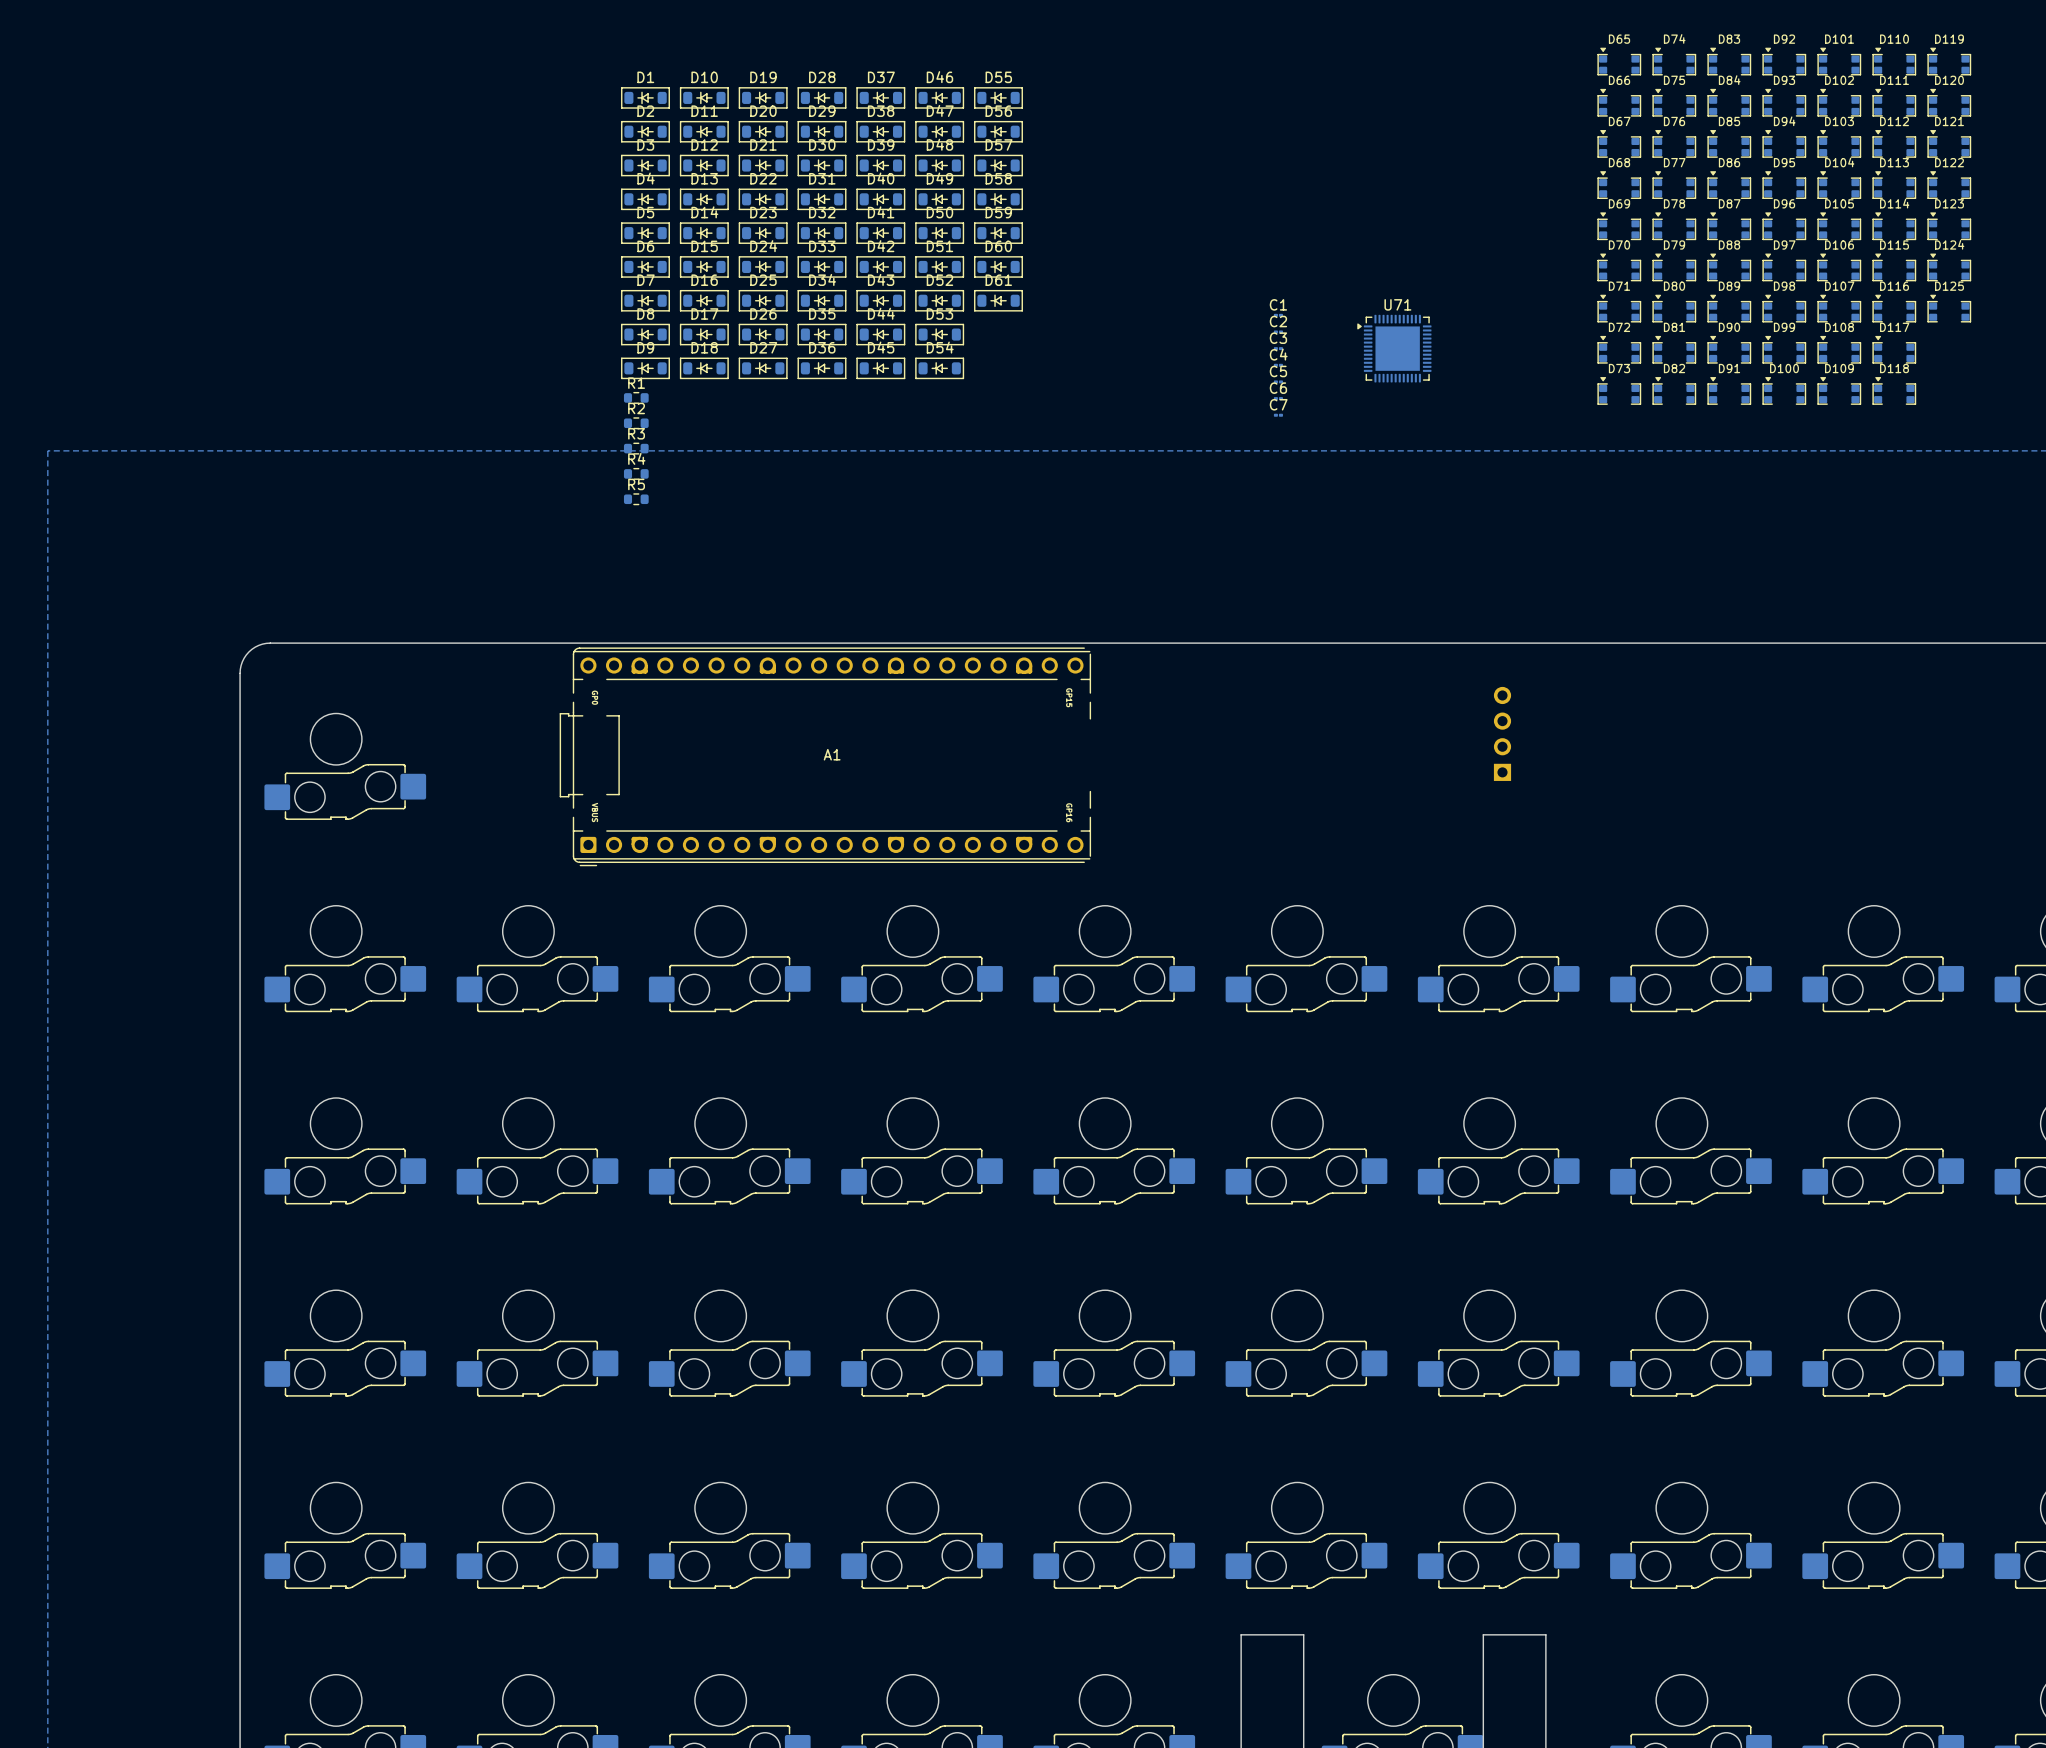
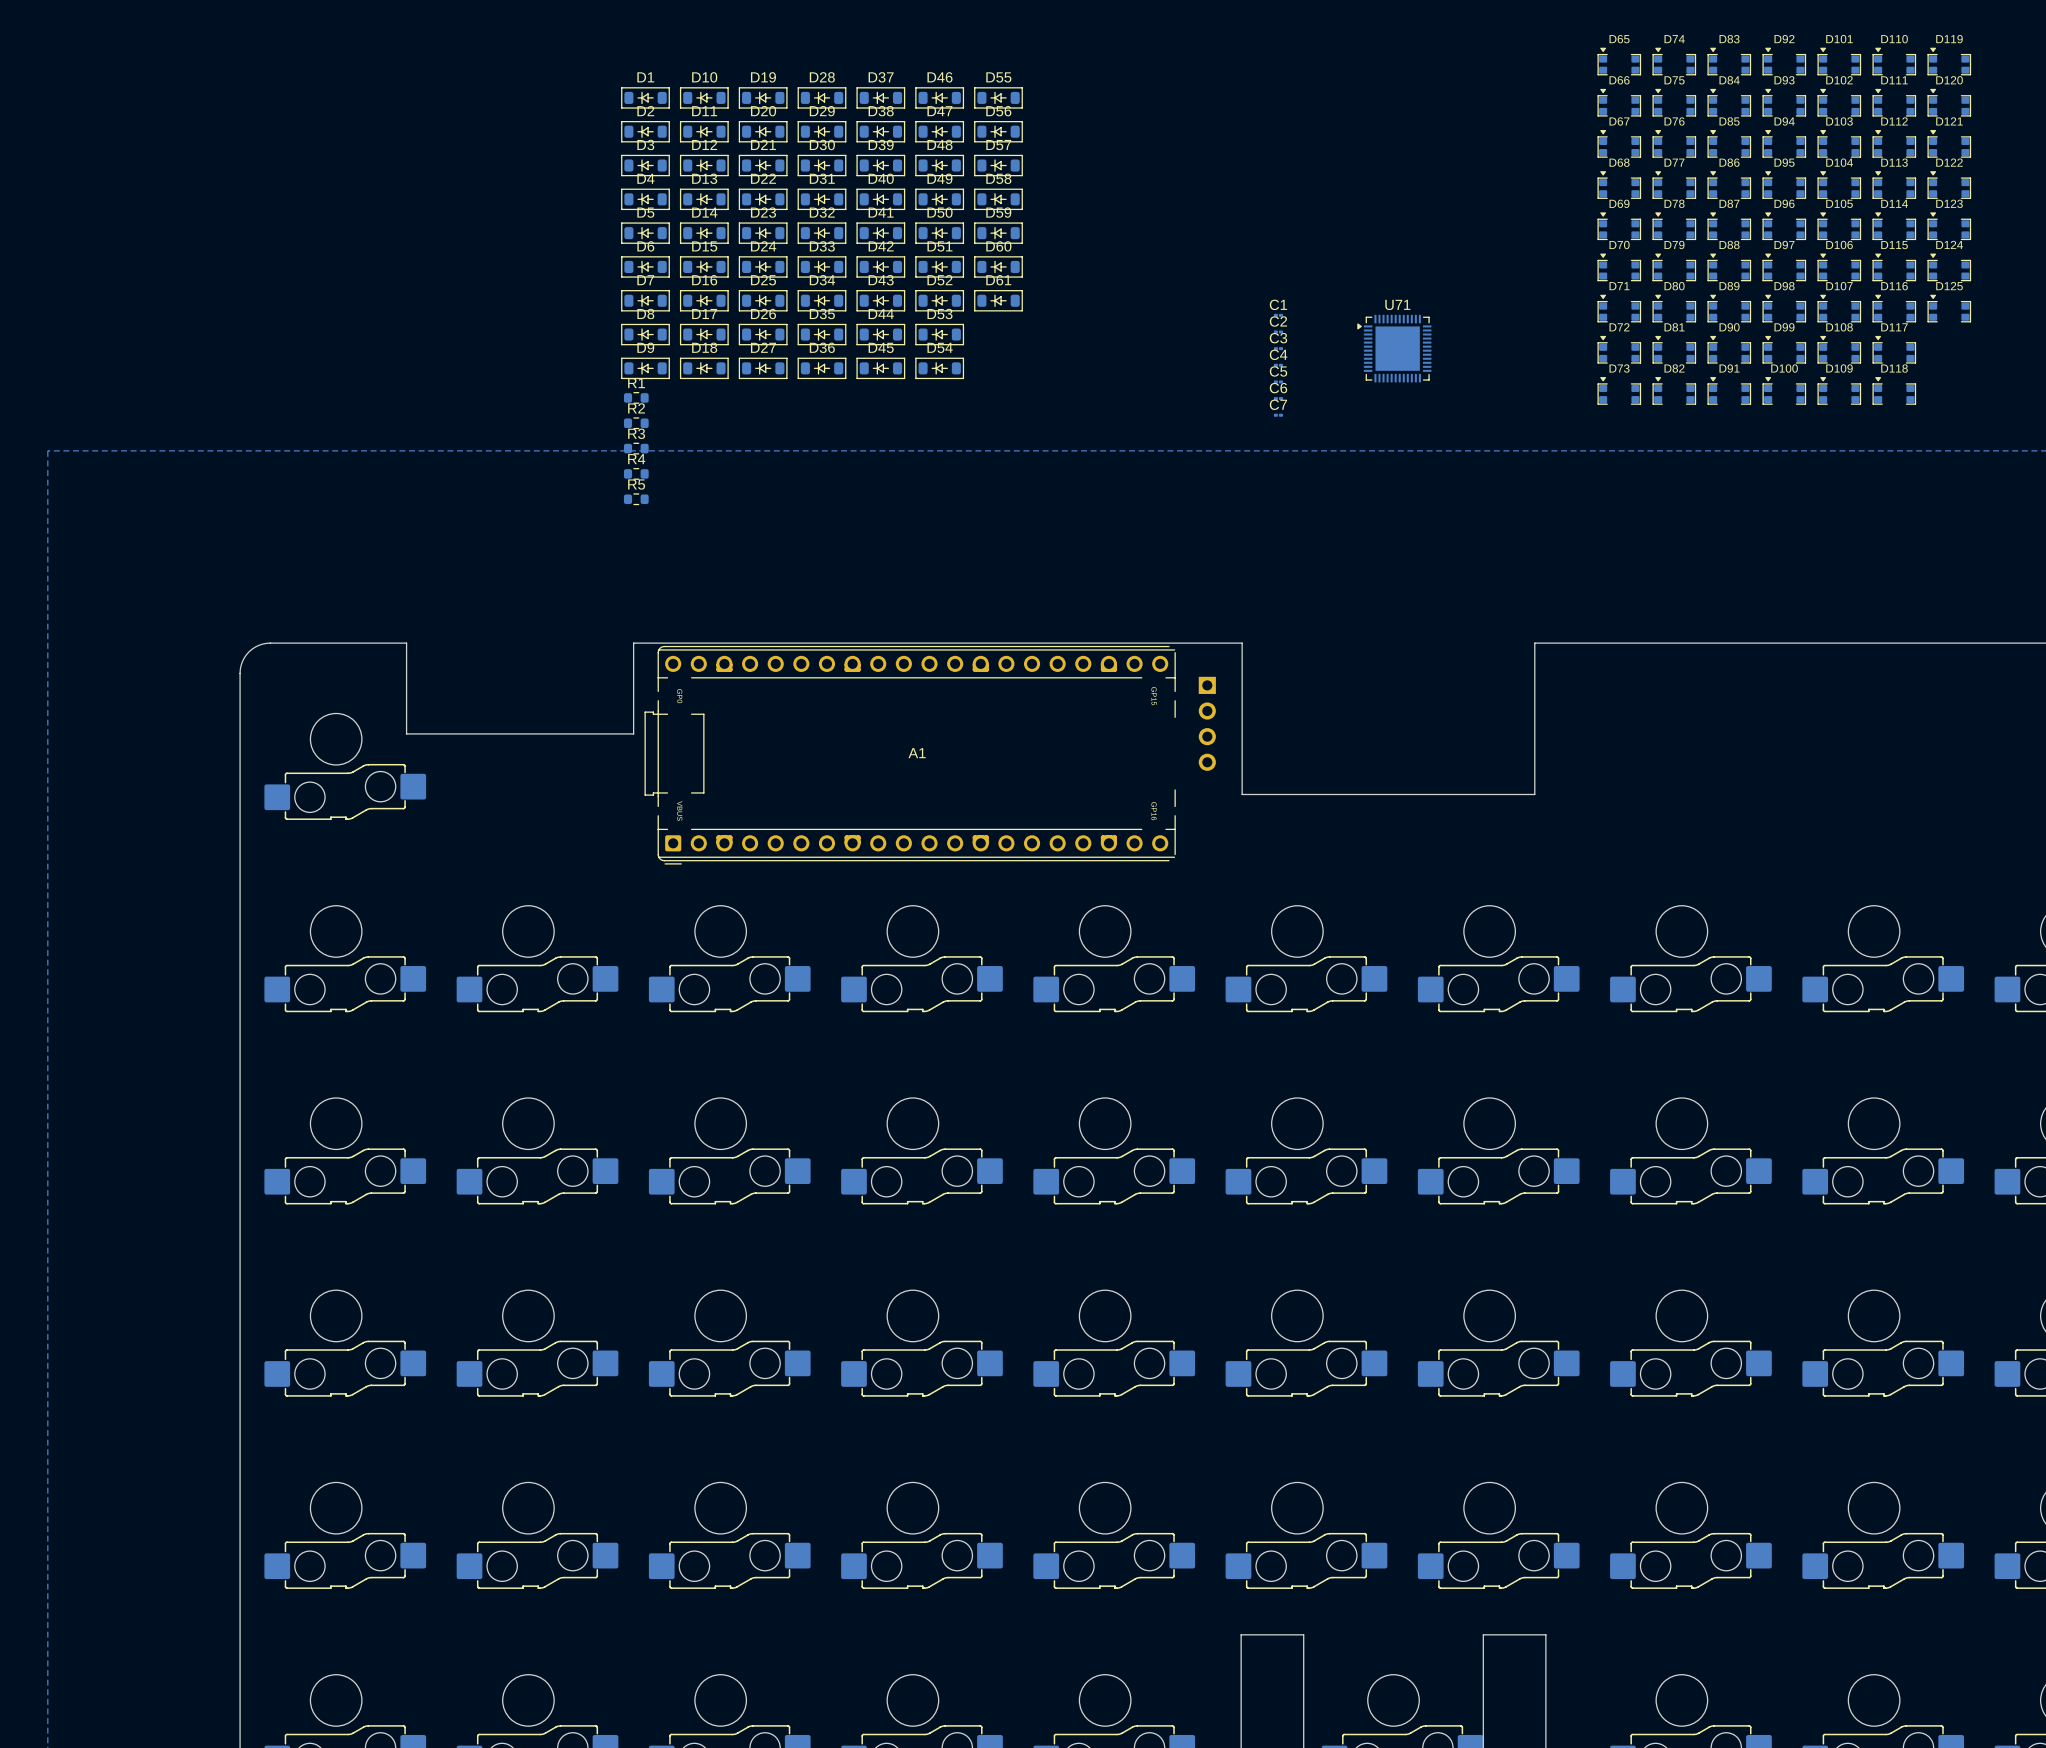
board edge: (633, 643) (406, 643) -> (633, 643) (633, 733) (406, 733) (406, 643)
board edge: (1534, 643) (1242, 643) -> (1534, 643) (1534, 794) (1242, 794) (1242, 643)
part: none -> (1207, 723)
part: (1502, 733) -> none
A1 position: (825, 756) -> (910, 755)

